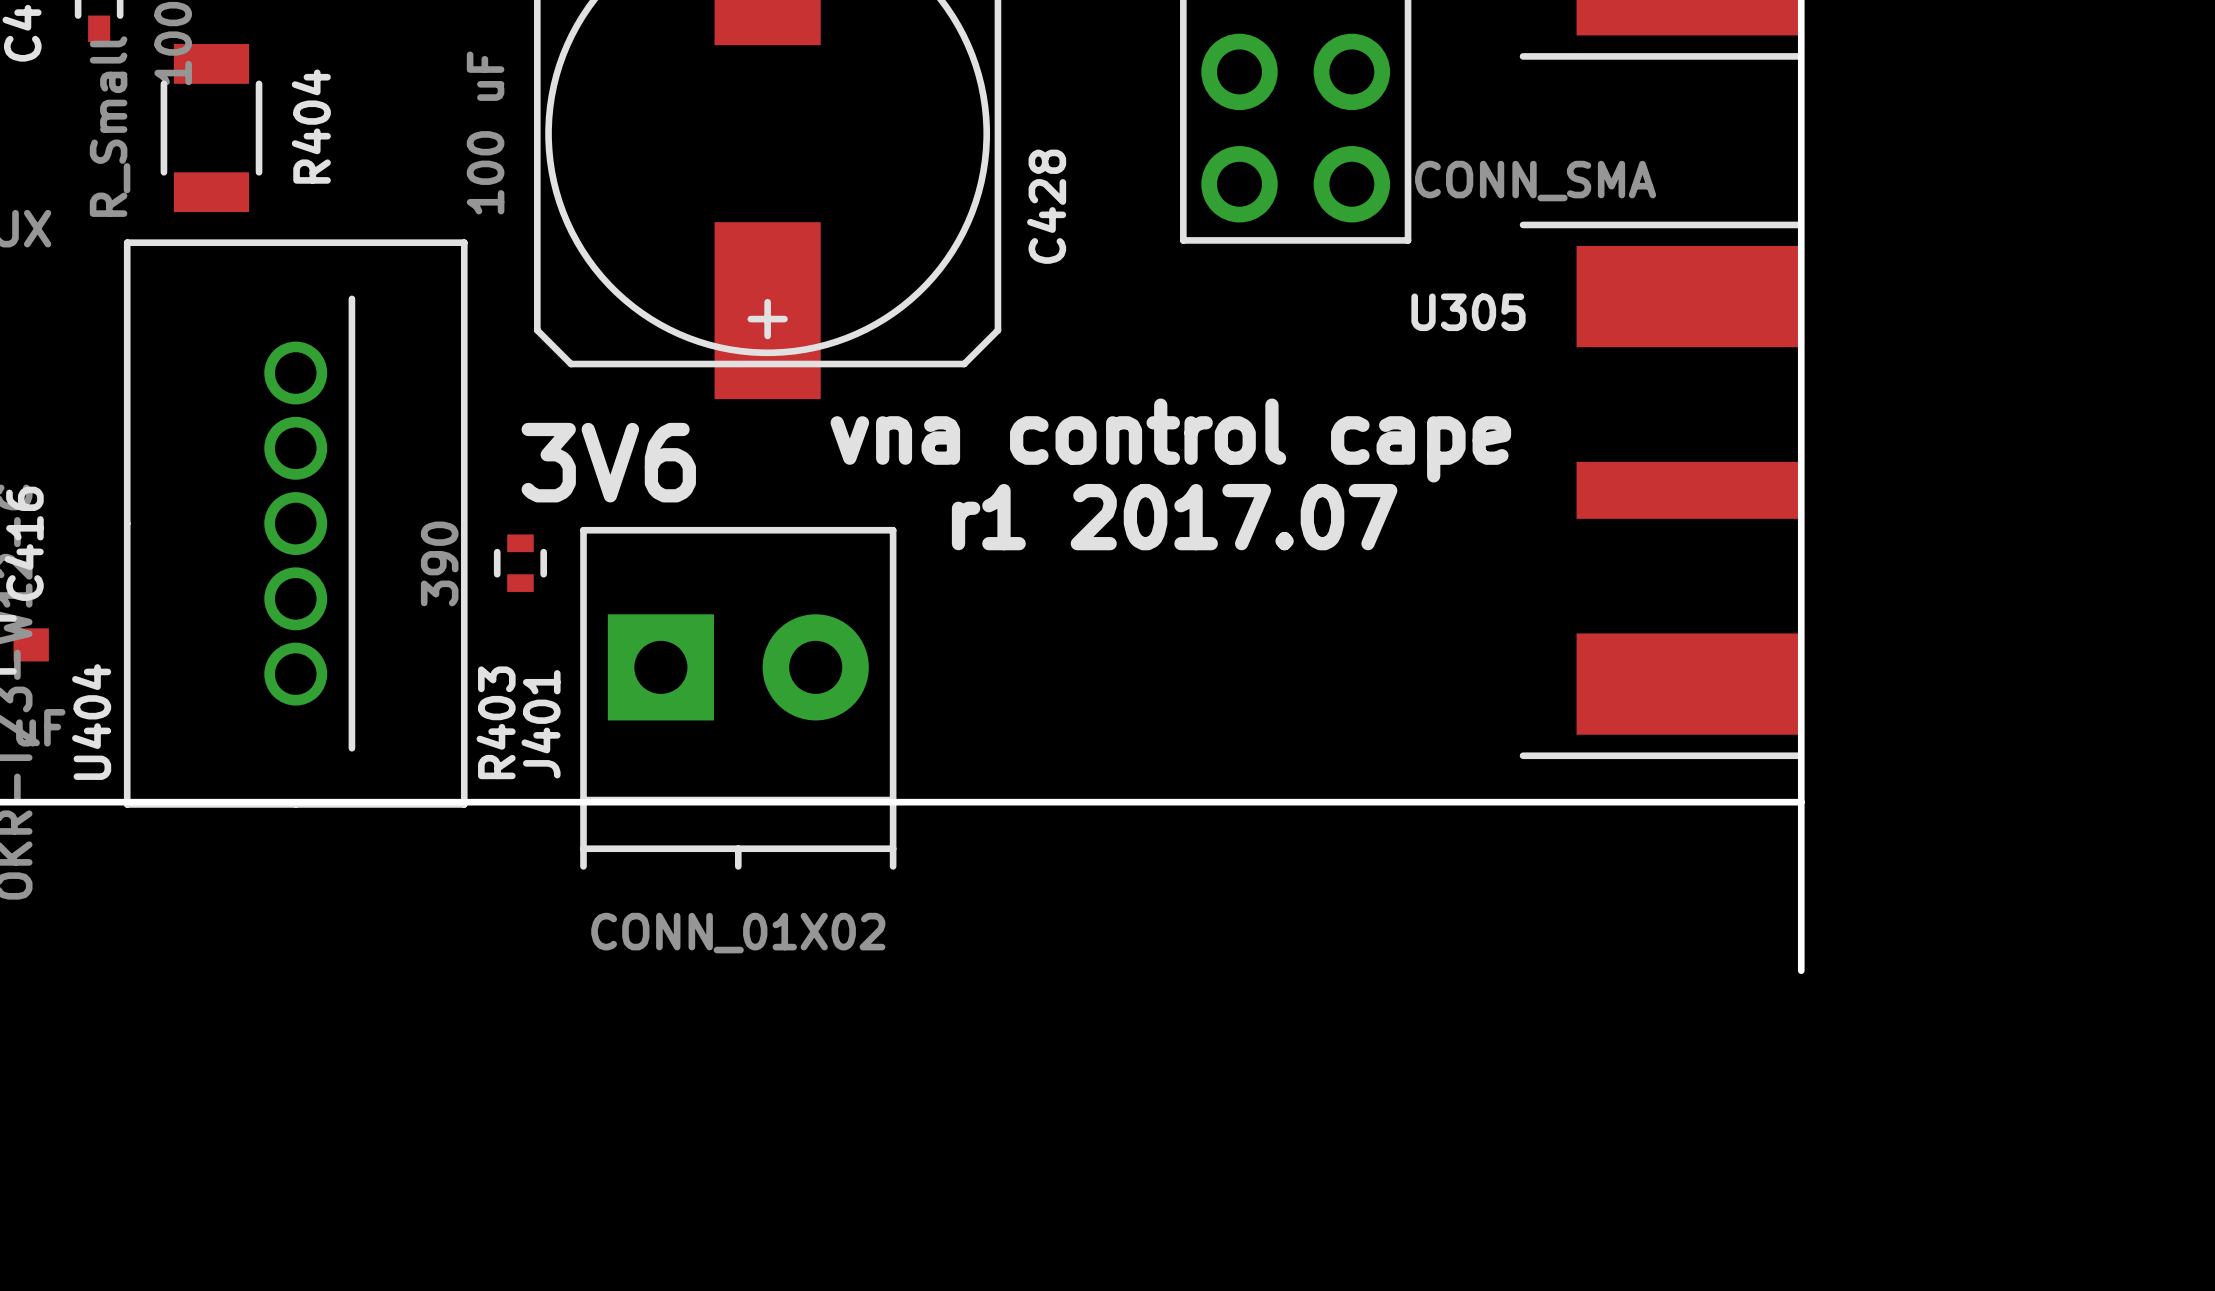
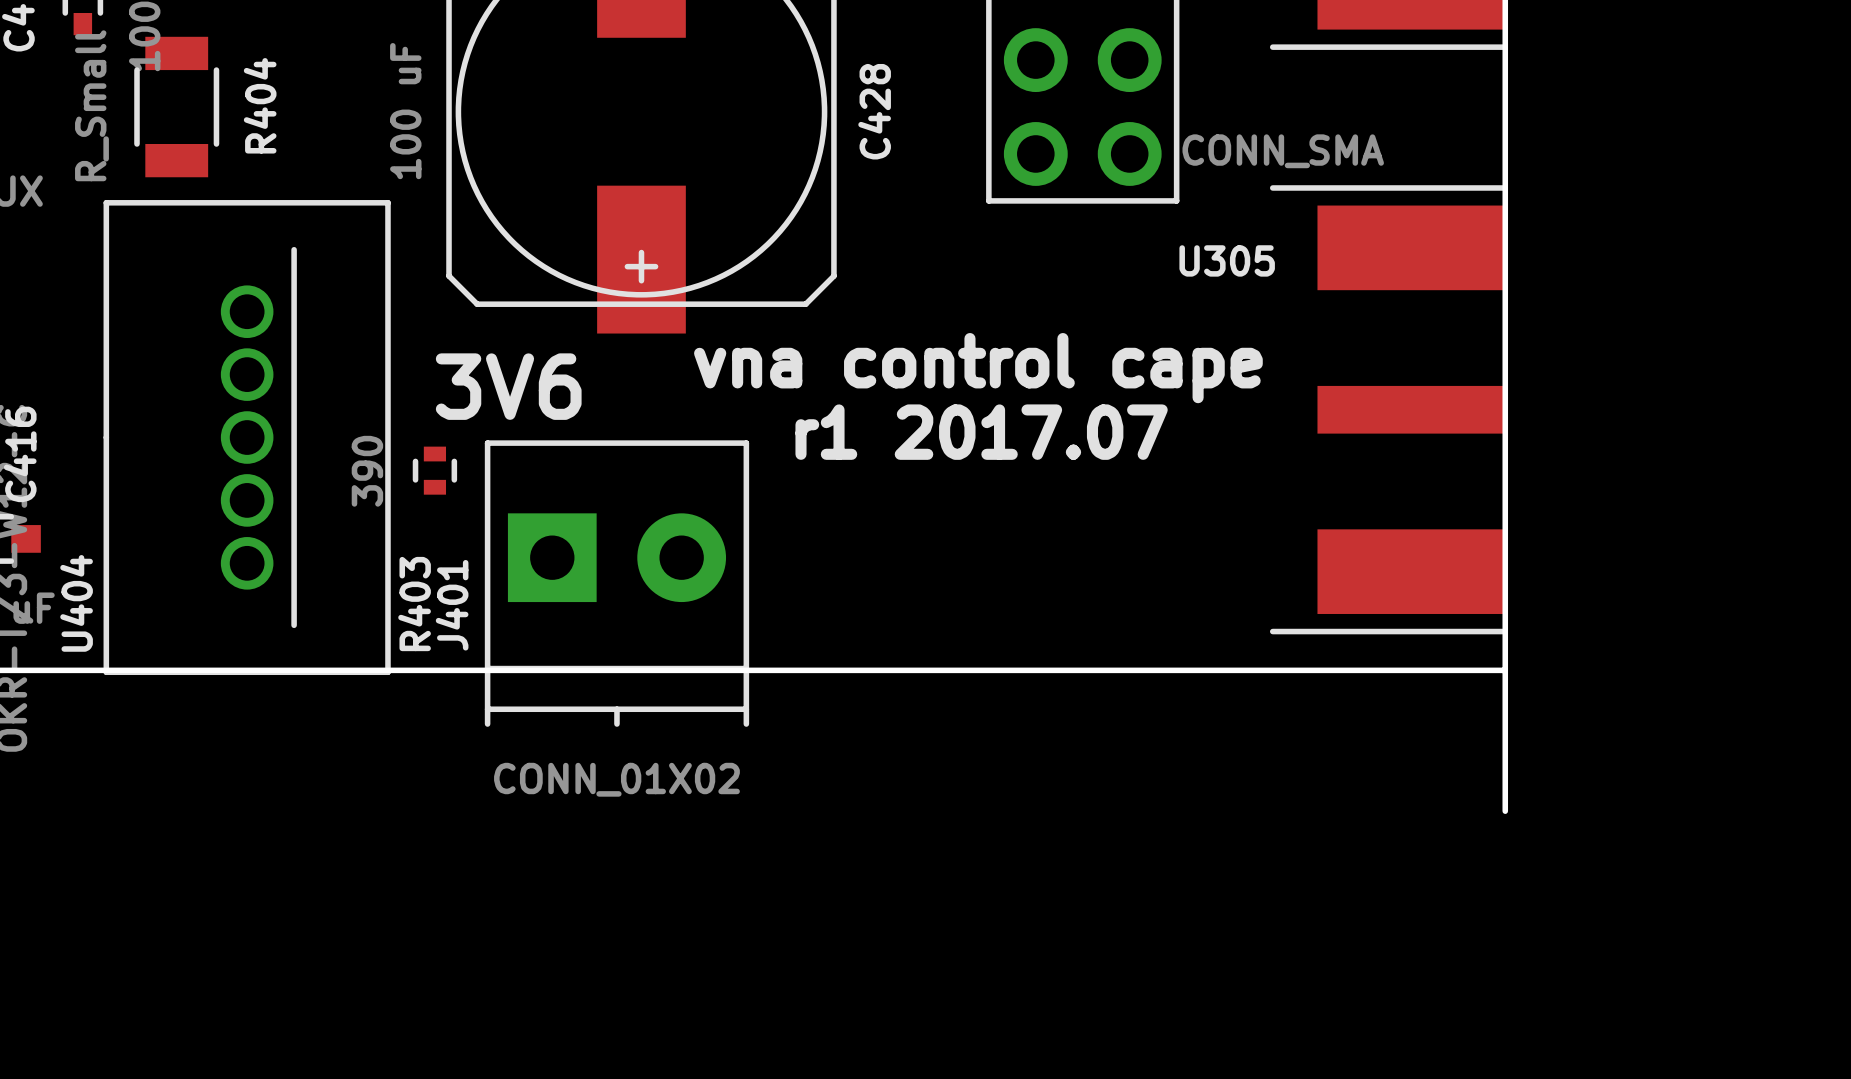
C428 name position: C428 (1046, 206) -> C428 (874, 111)

